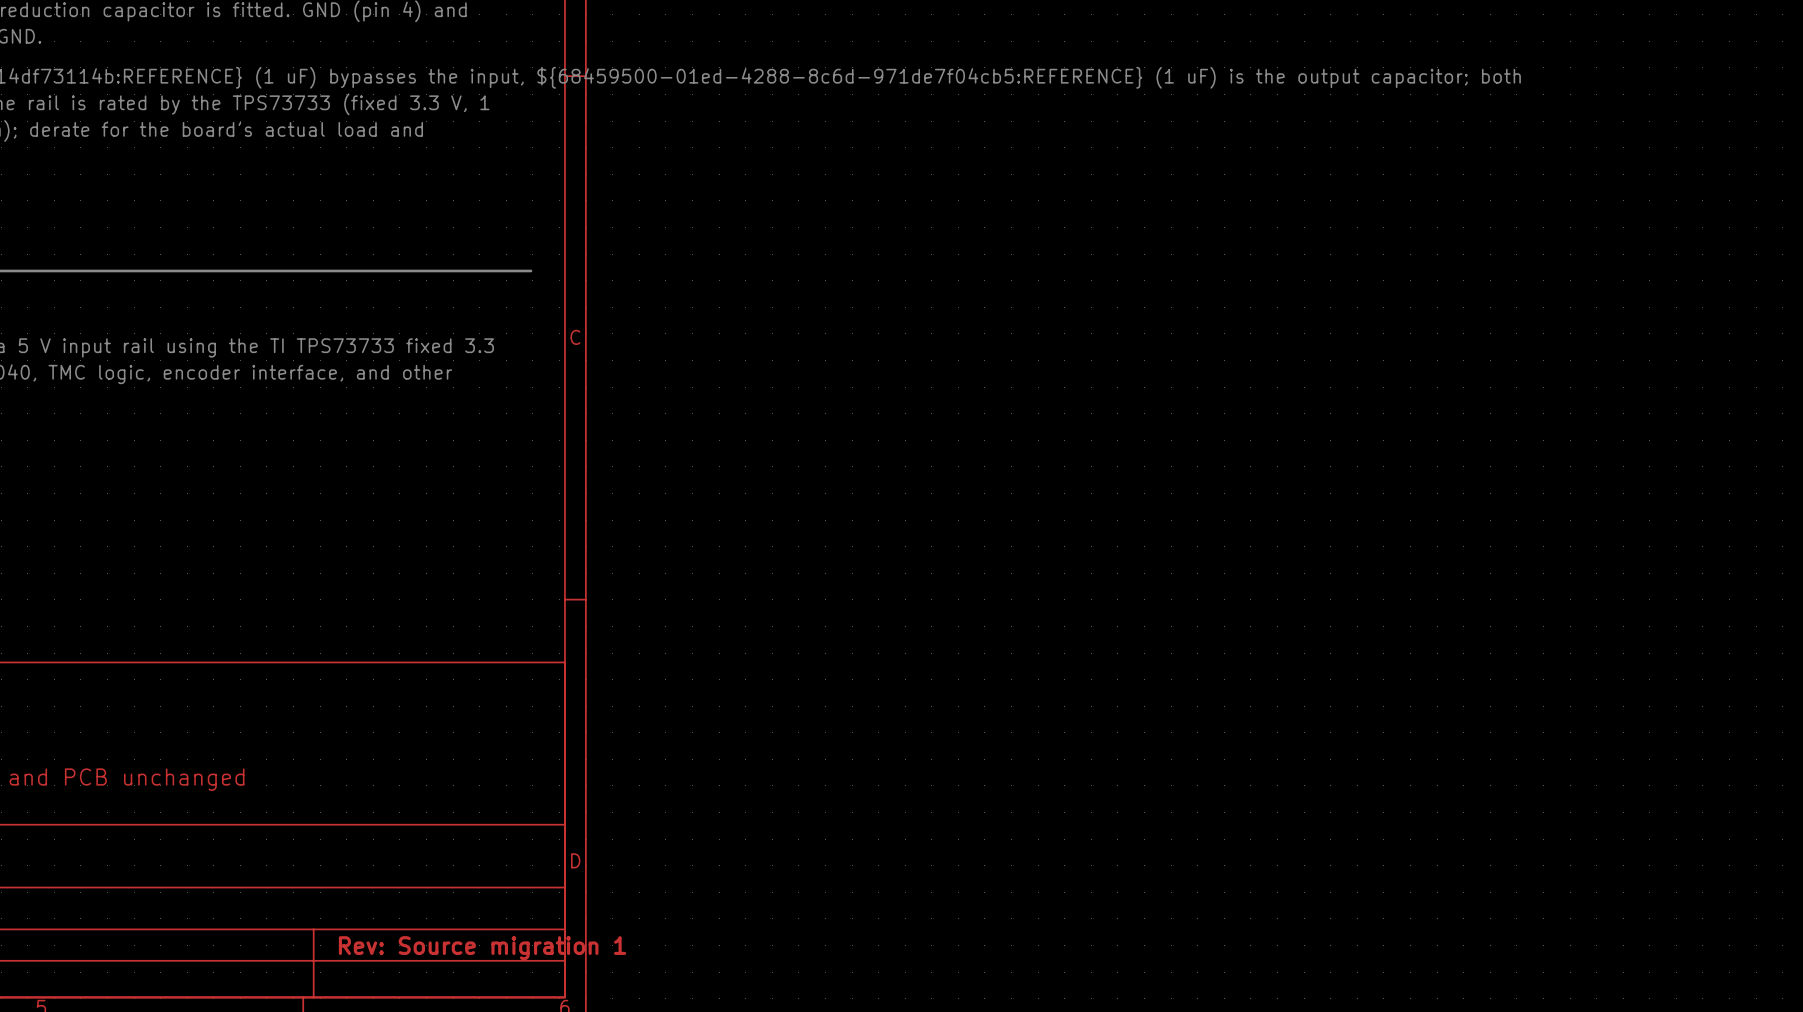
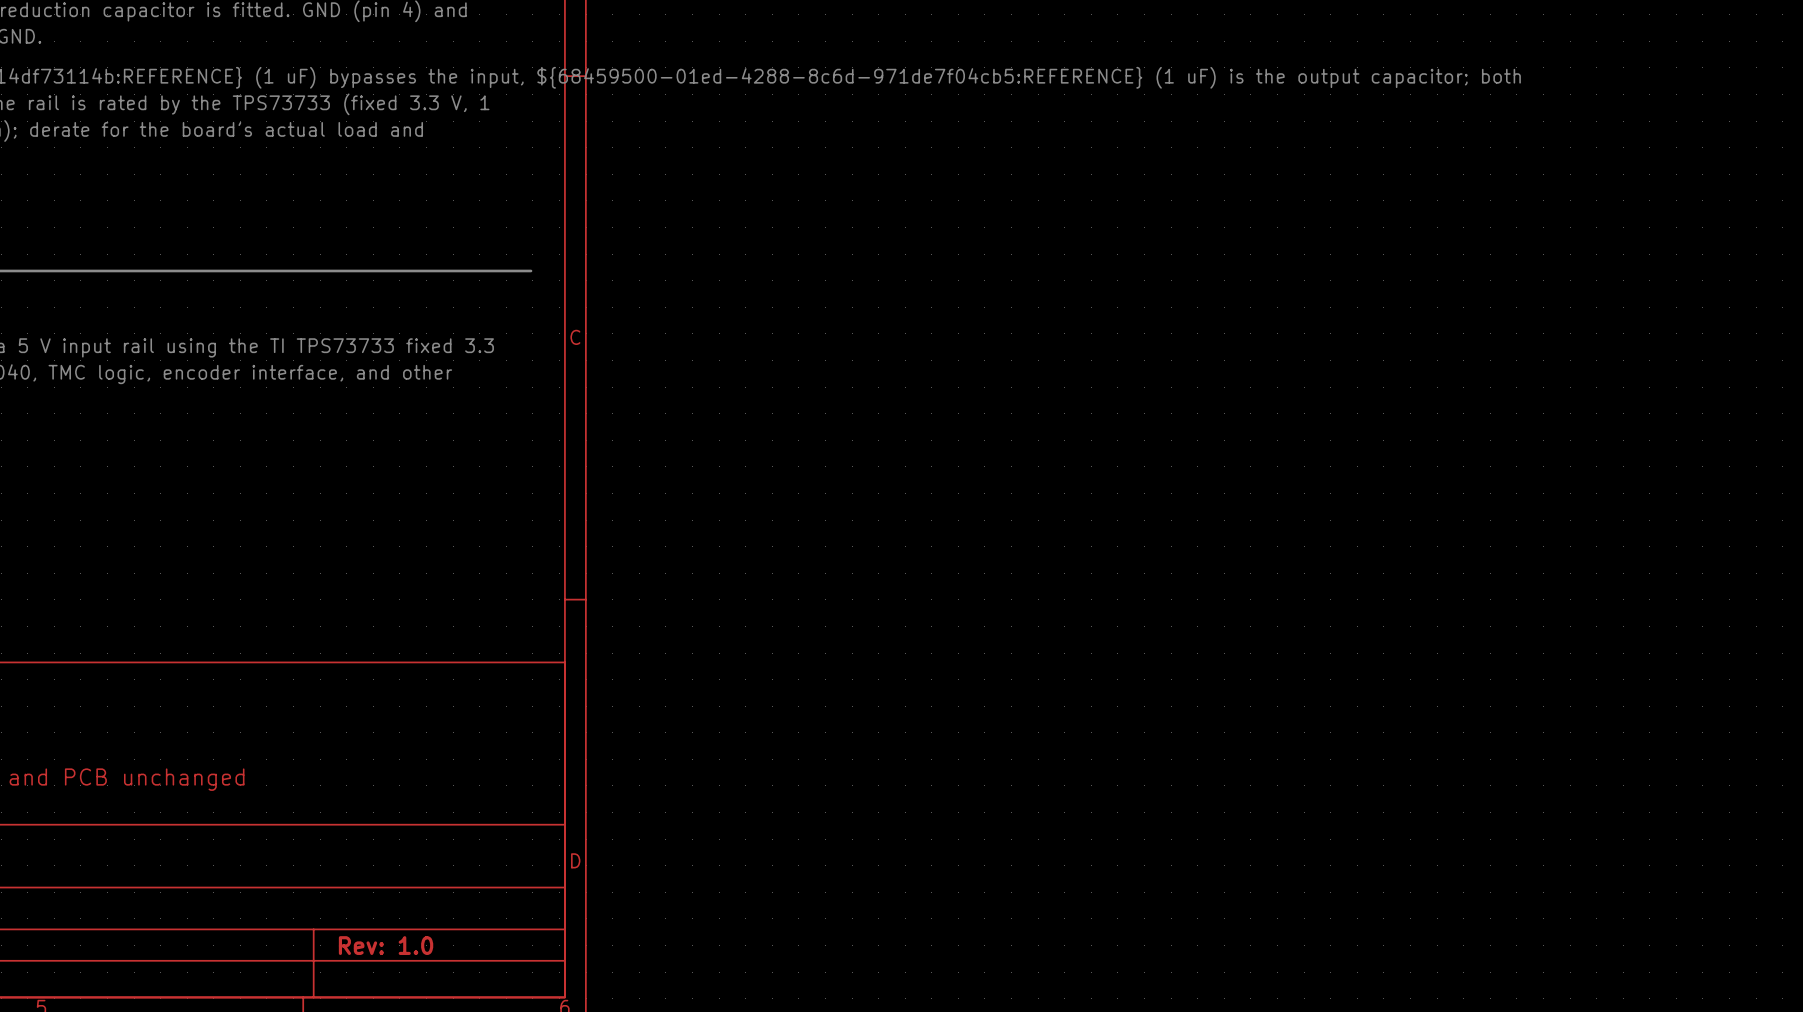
title block: Rev: Source migration 1 (482, 948) -> Rev: 1.0 (386, 945)

